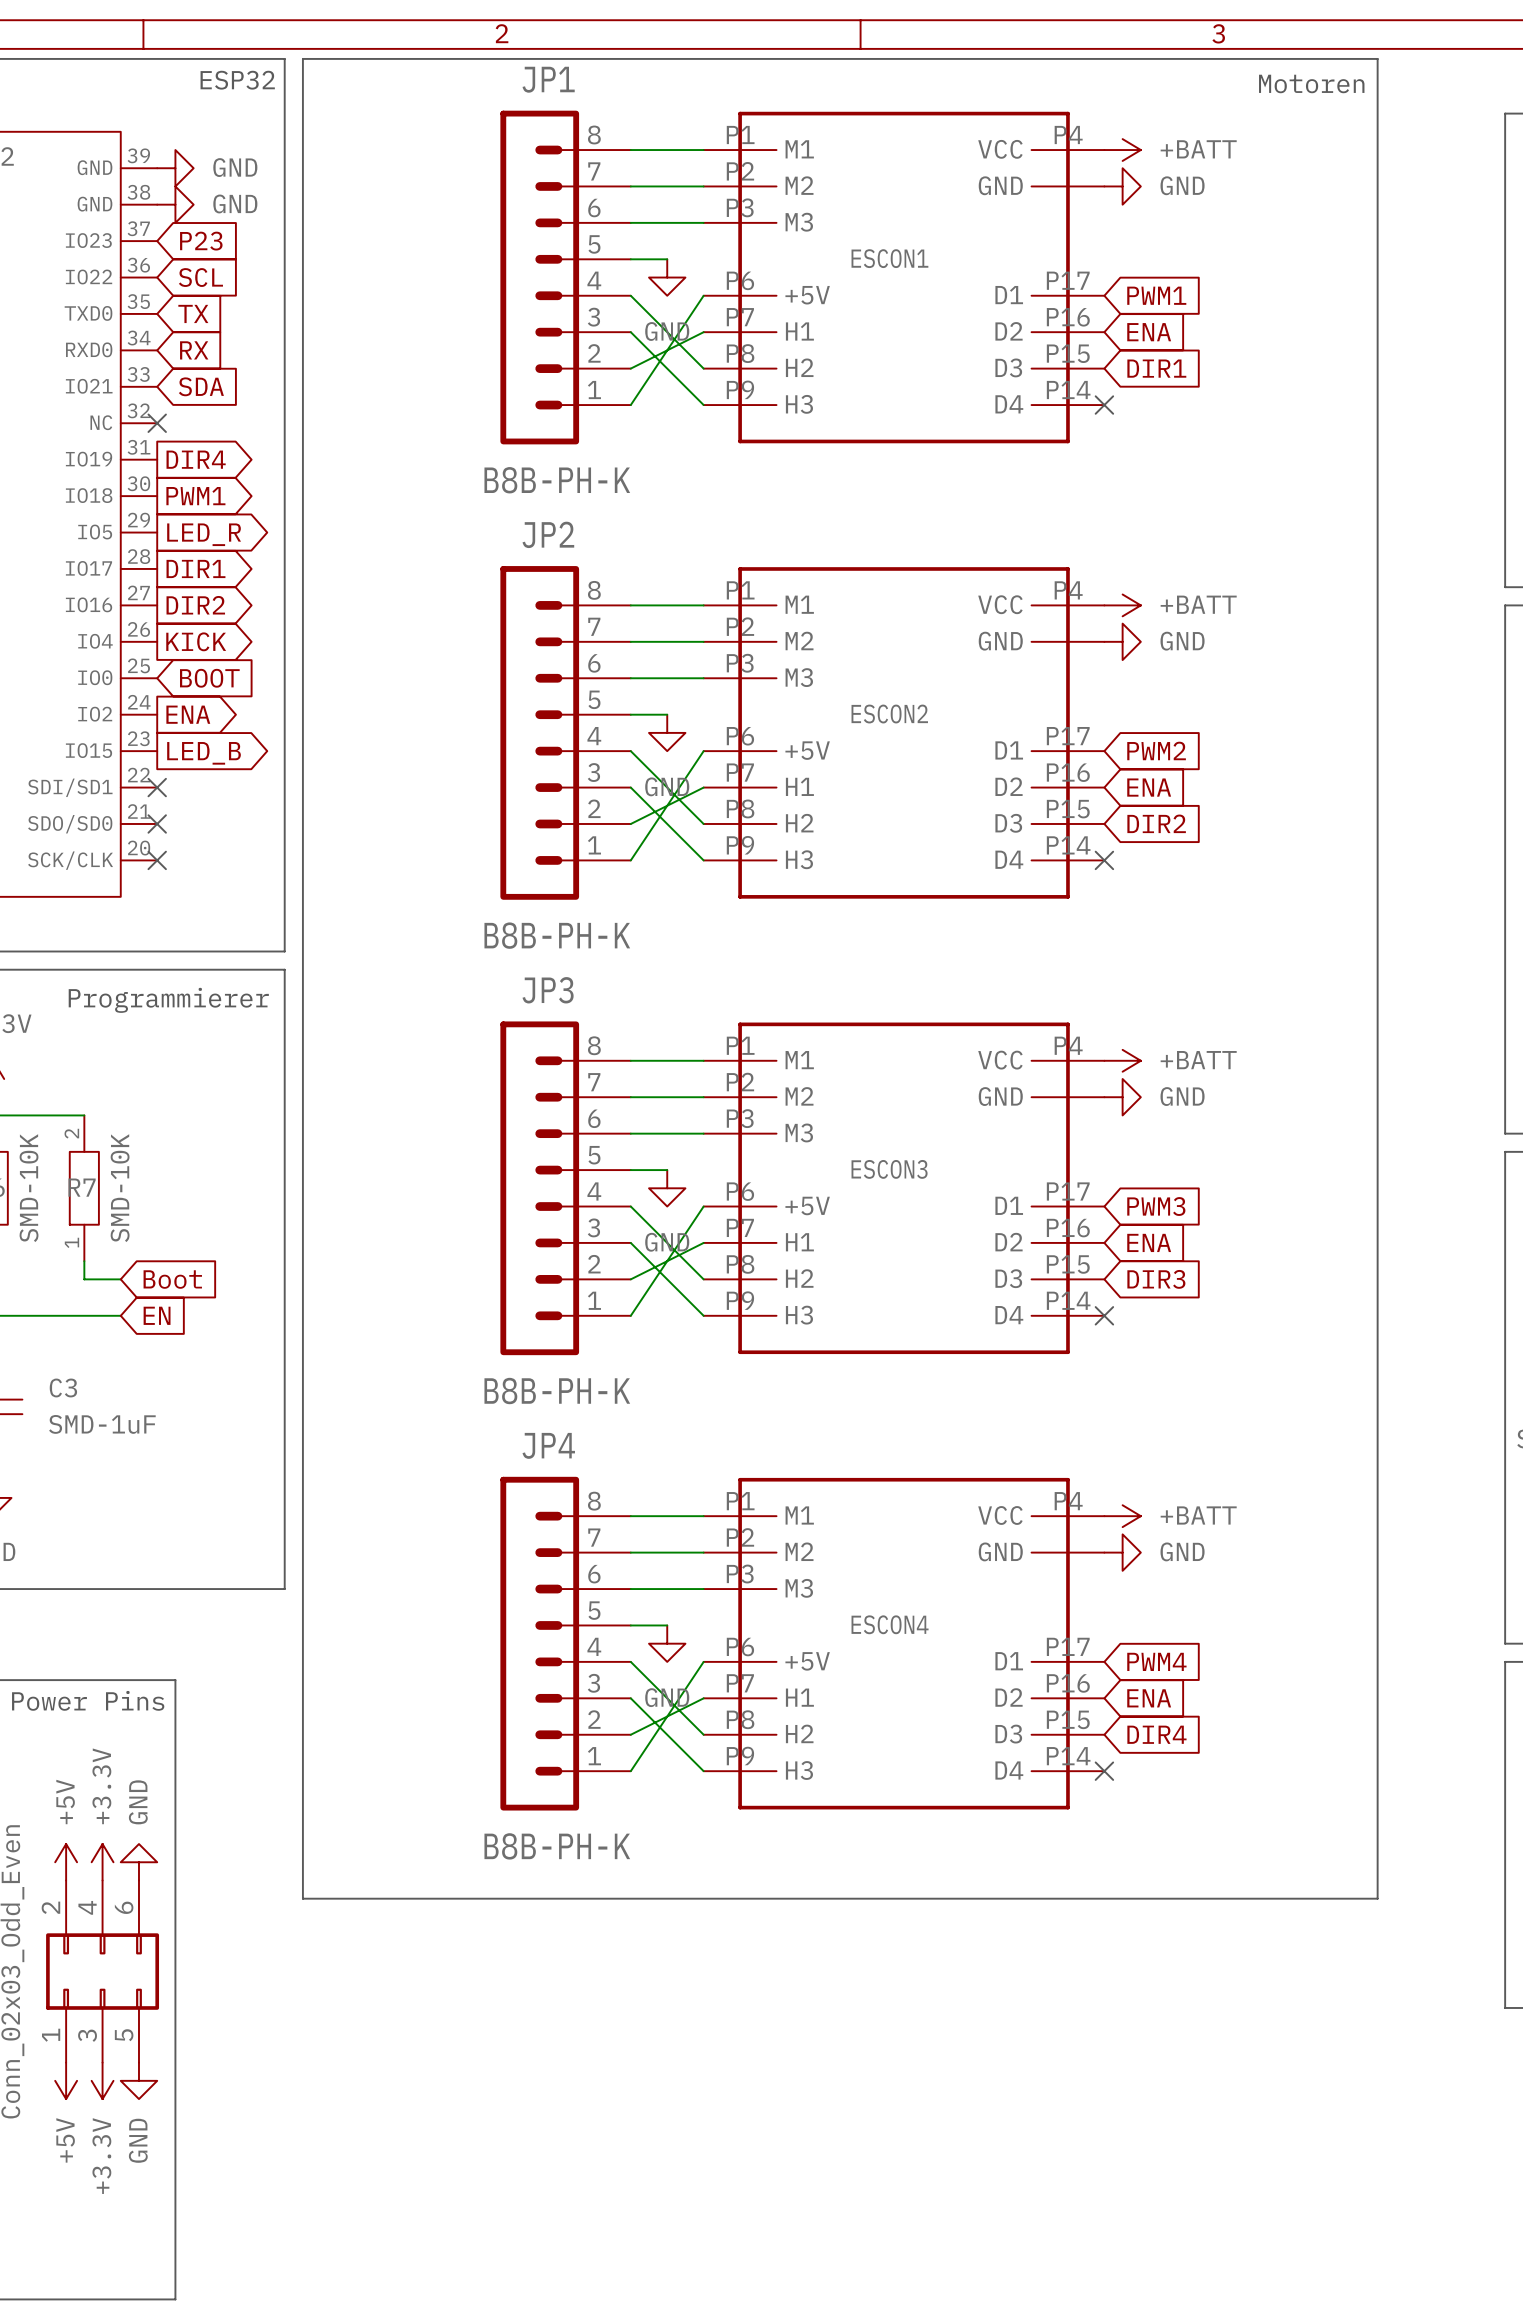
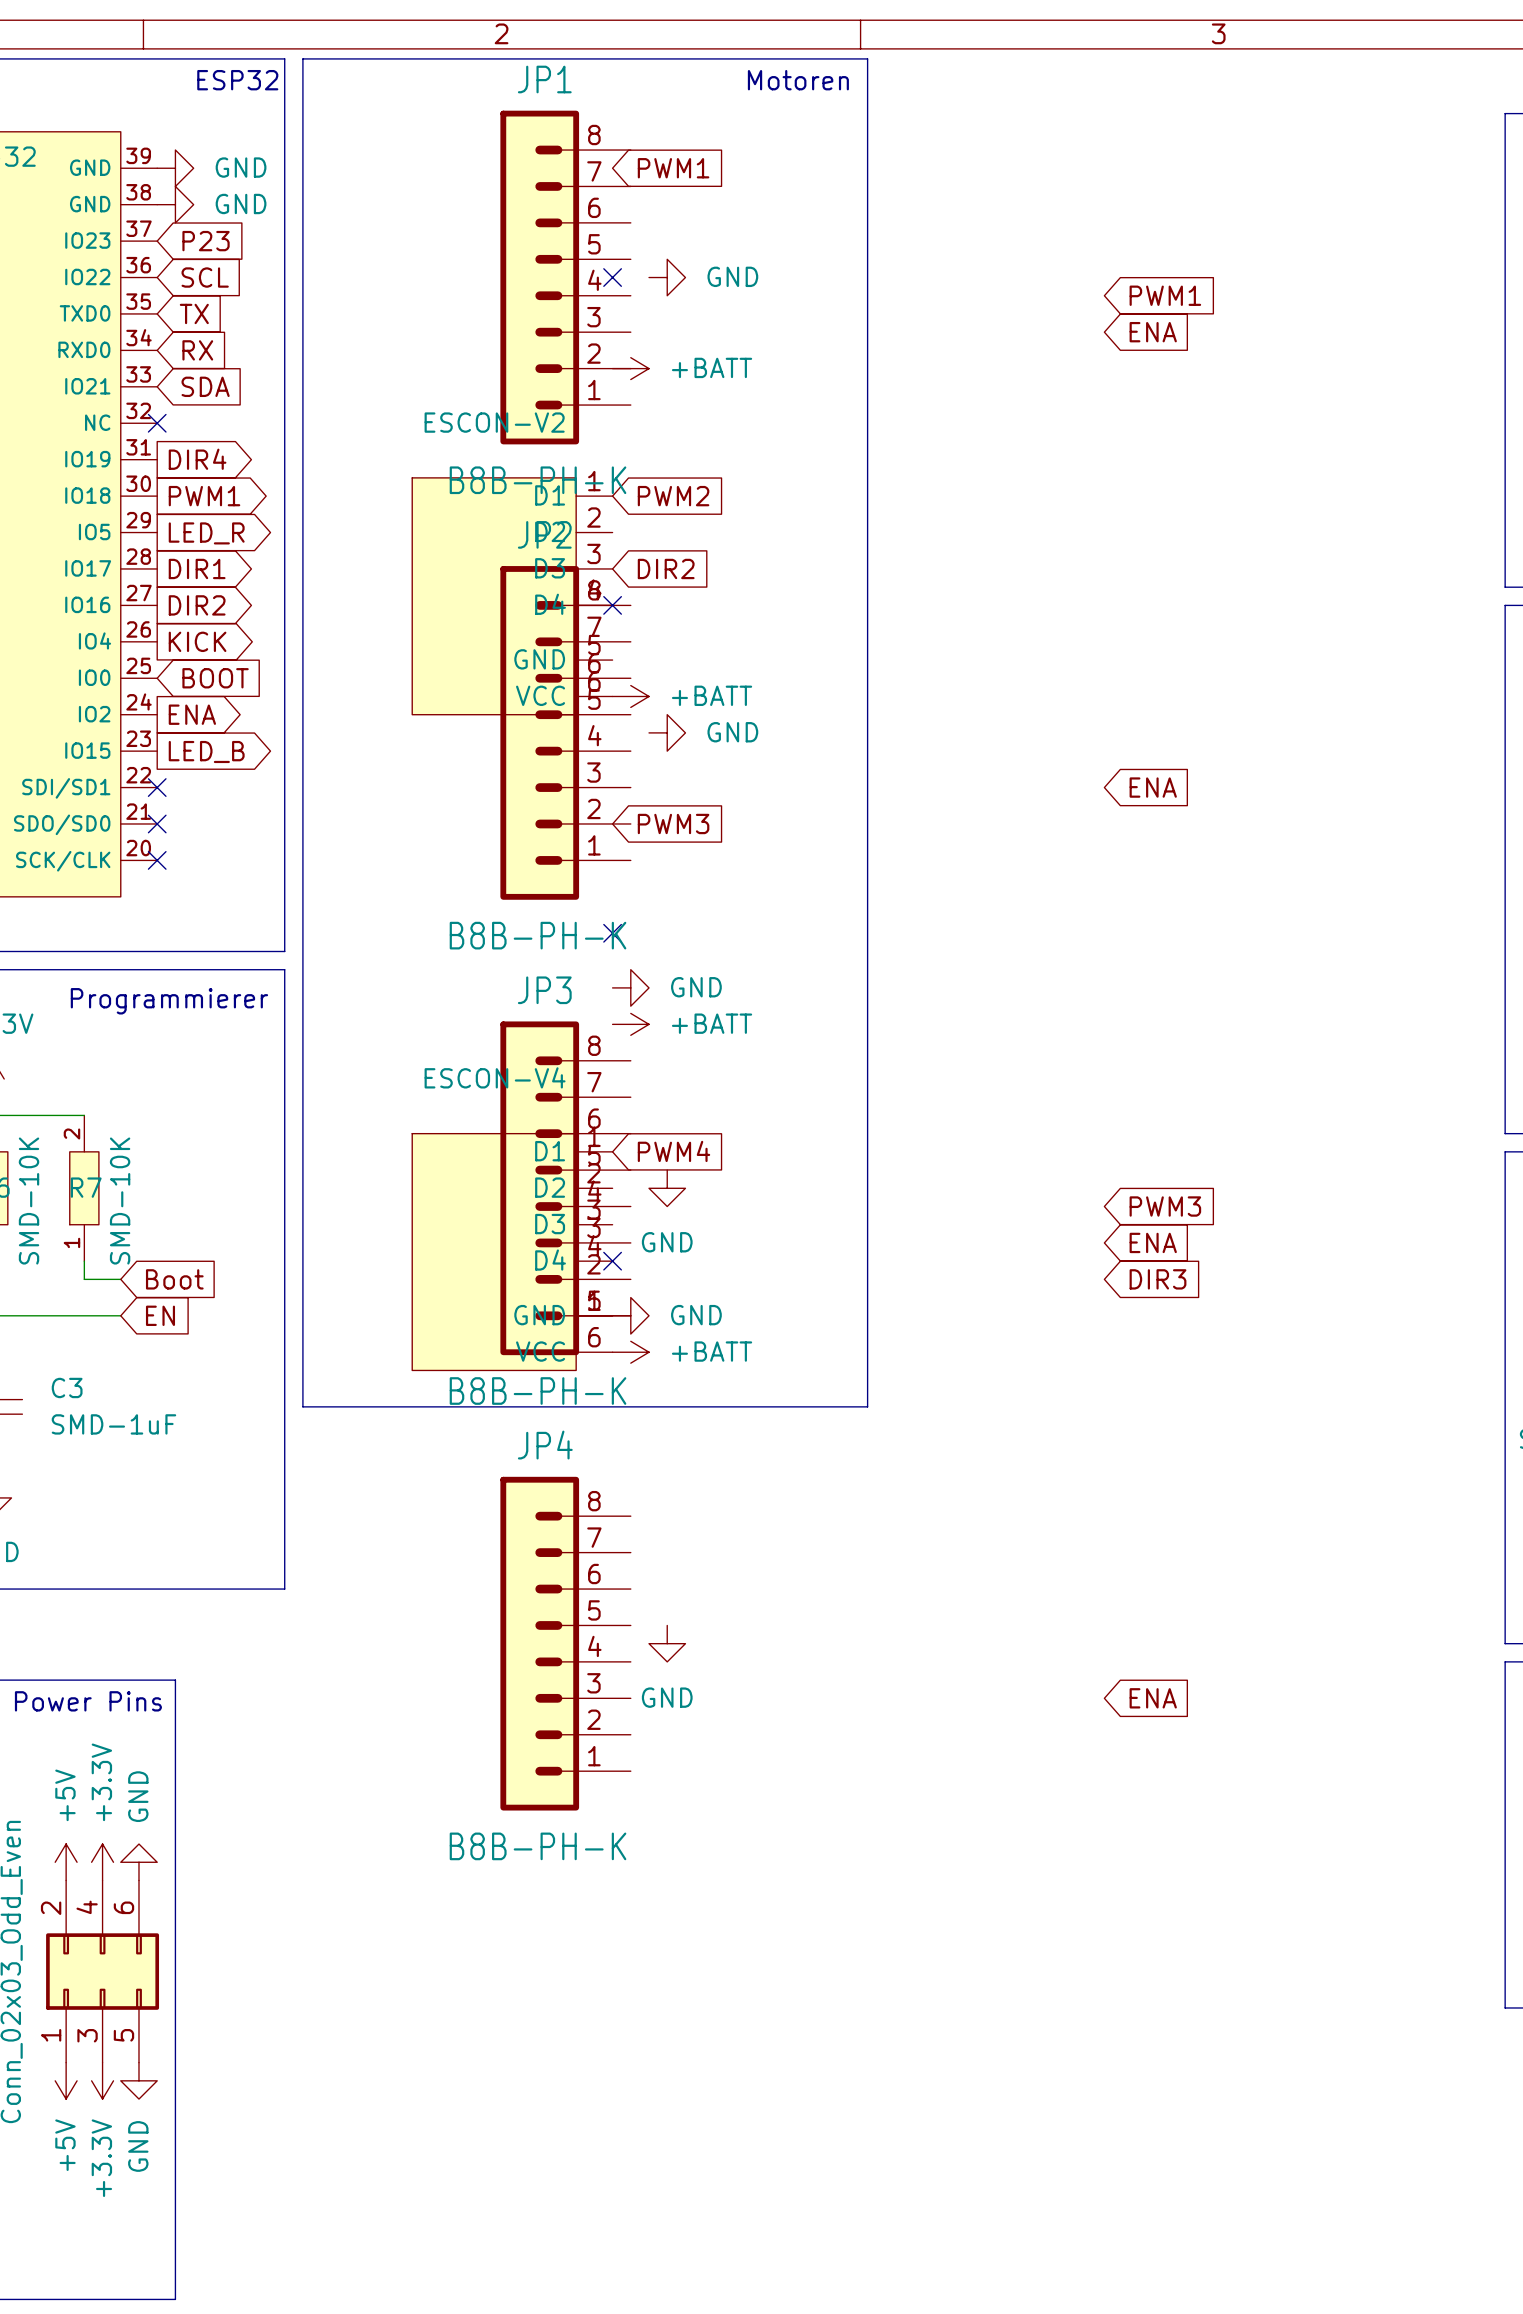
line: (867, 58) (1377, 58) (1377, 1898) (302, 1898) (302, 1406) -> (867, 58) (867, 1406) (302, 1406)
text: none -> Motoren (798, 80)
text: Motoren (1311, 83) -> none
power symbol: +BATT (1122, 150) -> none
global label: none -> PWM1 (673, 168)
power symbol: GND (1122, 186) -> none
wire: (630, 222) (703, 222) -> none
wire: (630, 259) (667, 259) -> none
no-connect mark: none -> (612, 277)
power symbol rotation: 0° (667, 277) -> 90° counterclockwise (667, 277)
ESCON1: (904, 277) -> none
wire: (630, 295) (703, 368) -> none
wire: (703, 295) (630, 405) -> none
wire: (630, 332) (703, 405) -> none
wire: (703, 332) (630, 368) -> none
power symbol: none -> +BATT (630, 368)
global label: DIR1 (1156, 368) -> none
no-connect mark: (1104, 405) -> none
global label: none -> PWM2 (673, 496)
global label: none -> DIR2 (666, 568)
ESCON-V2: none -> (512, 596)
no-connect mark: none -> (612, 605)
wire: (630, 605) (703, 605) -> none
power symbol: +BATT (1122, 605) -> none
wire: (630, 641) (703, 641) -> none
power symbol: GND (1122, 641) -> none
wire: (630, 678) (703, 678) -> none
power symbol: none -> +BATT (630, 696)
wire: (630, 714) (667, 714) -> none
power symbol rotation: 0° (667, 732) -> 90° counterclockwise (667, 732)
ESCON2: (904, 732) -> none
global label: PWM2 (1156, 750) -> none
wire: (630, 751) (703, 823) -> none
wire: (703, 751) (630, 860) -> none
wire: (630, 787) (703, 860) -> none
wire: (703, 787) (630, 823) -> none
global label: none -> PWM3 (673, 823)
global label: DIR2 (1156, 823) -> none
no-connect mark: (1104, 860) -> none
no-connect mark: none -> (612, 933)
power symbol: none -> GND (630, 987)
power symbol: none -> +BATT (630, 1024)
wire: (630, 1060) (703, 1060) -> none
power symbol: +BATT (1122, 1060) -> none
wire: (630, 1097) (703, 1097) -> none
power symbol: GND (1122, 1097) -> none
global label: none -> PWM4 (673, 1151)
ESCON3: (904, 1188) -> none
wire: (630, 1206) (703, 1279) -> none
wire: (703, 1206) (630, 1315) -> none
wire: (630, 1242) (703, 1315) -> none
wire: (703, 1242) (630, 1279) -> none
ESCON-V4: none -> (512, 1252)
no-connect mark: none -> (612, 1261)
power symbol: none -> GND (630, 1315)
no-connect mark: (1104, 1315) -> none
power symbol: none -> +BATT (630, 1352)
wire: (630, 1516) (703, 1516) -> none
power symbol: +BATT (1122, 1516) -> none
wire: (630, 1552) (703, 1552) -> none
power symbol: GND (1122, 1552) -> none
wire: (630, 1589) (703, 1589) -> none
wire: (630, 1625) (667, 1625) -> none
ESCON4: (904, 1643) -> none
wire: (630, 1661) (703, 1734) -> none
wire: (703, 1661) (630, 1771) -> none
global label: PWM4 (1156, 1661) -> none
wire: (630, 1698) (703, 1771) -> none
wire: (703, 1698) (630, 1734) -> none
global label: DIR4 (1156, 1734) -> none
no-connect mark: (1104, 1771) -> none

